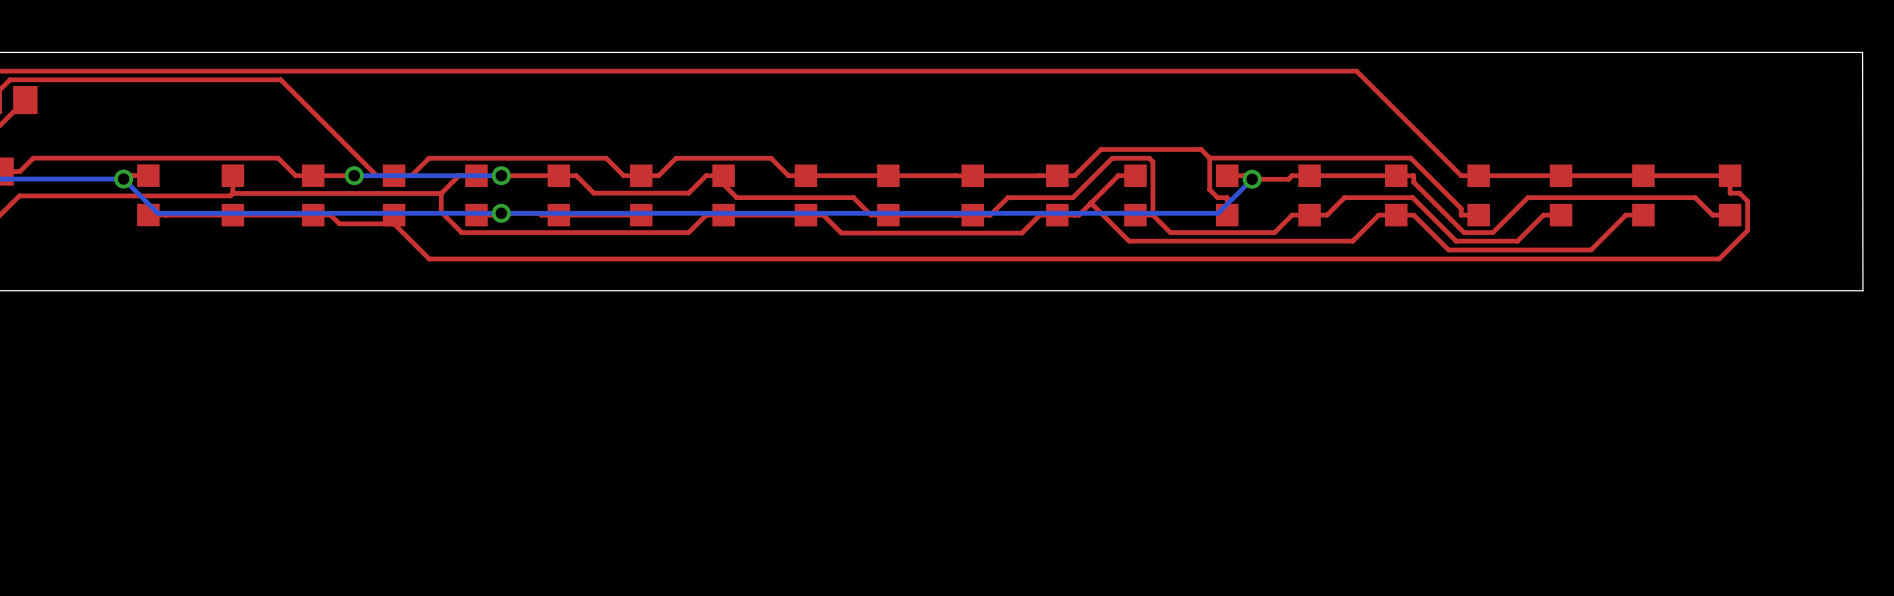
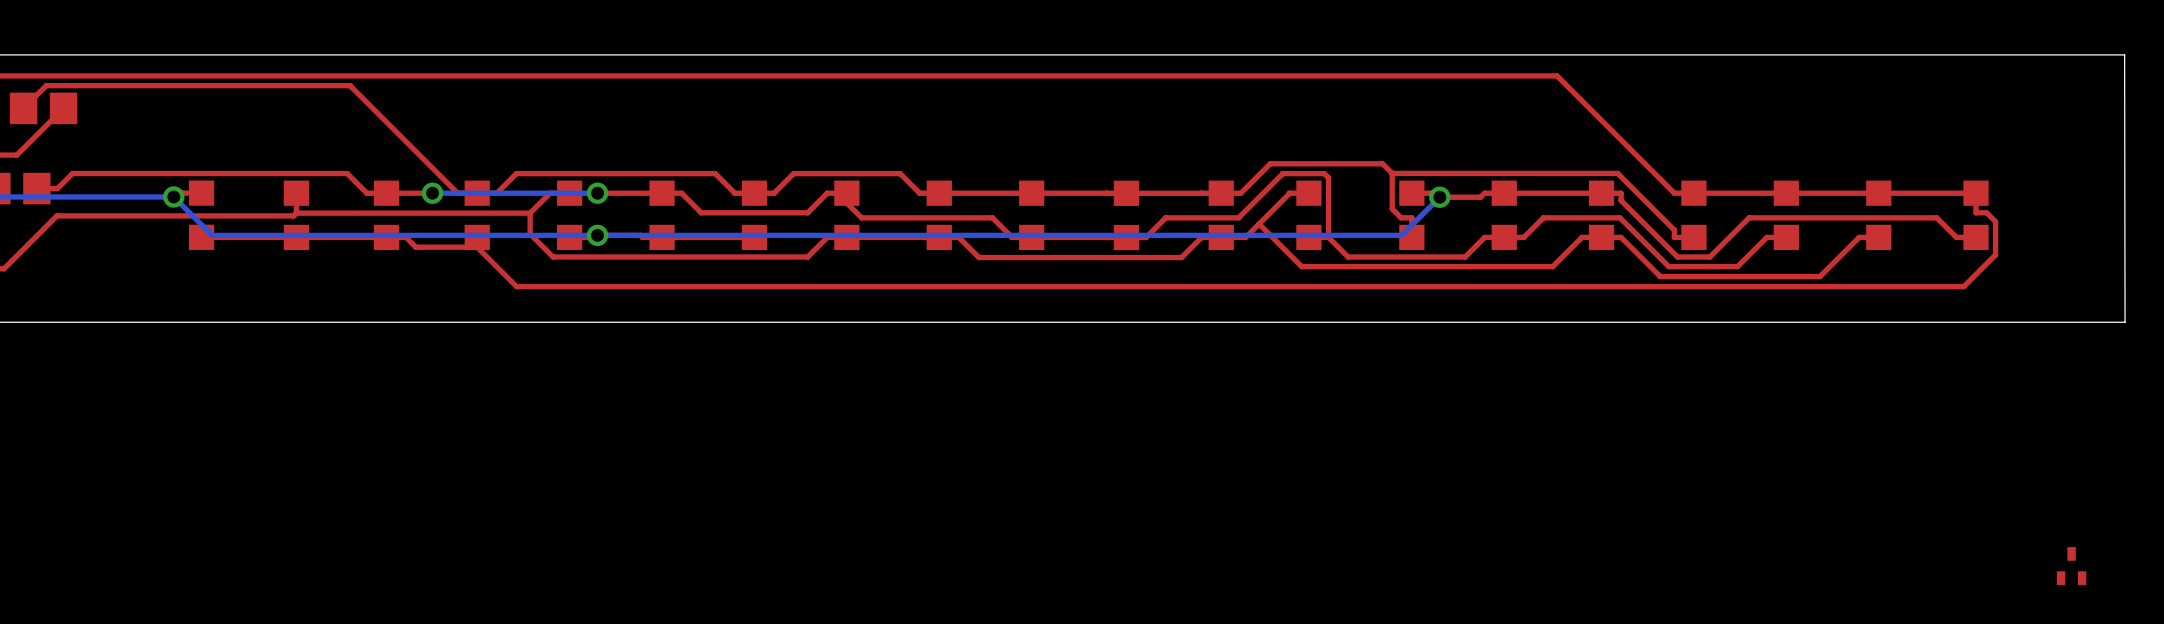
part: none -> (2071, 566)

